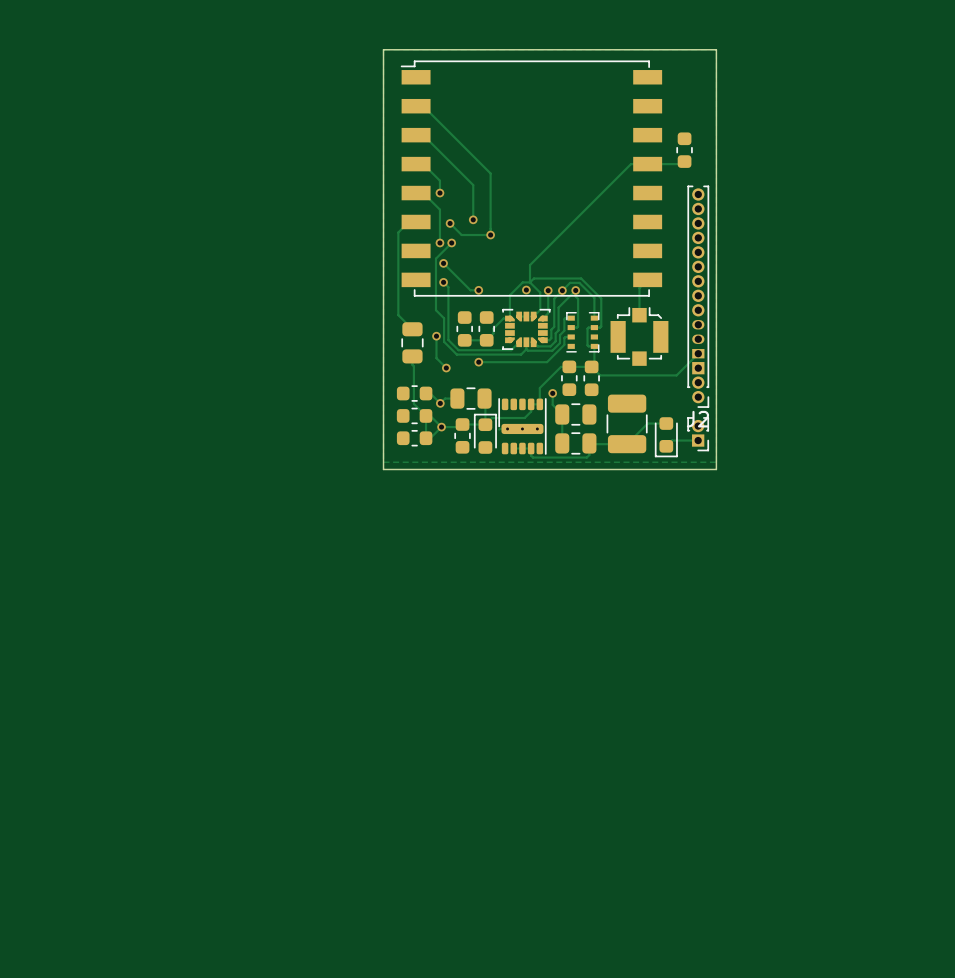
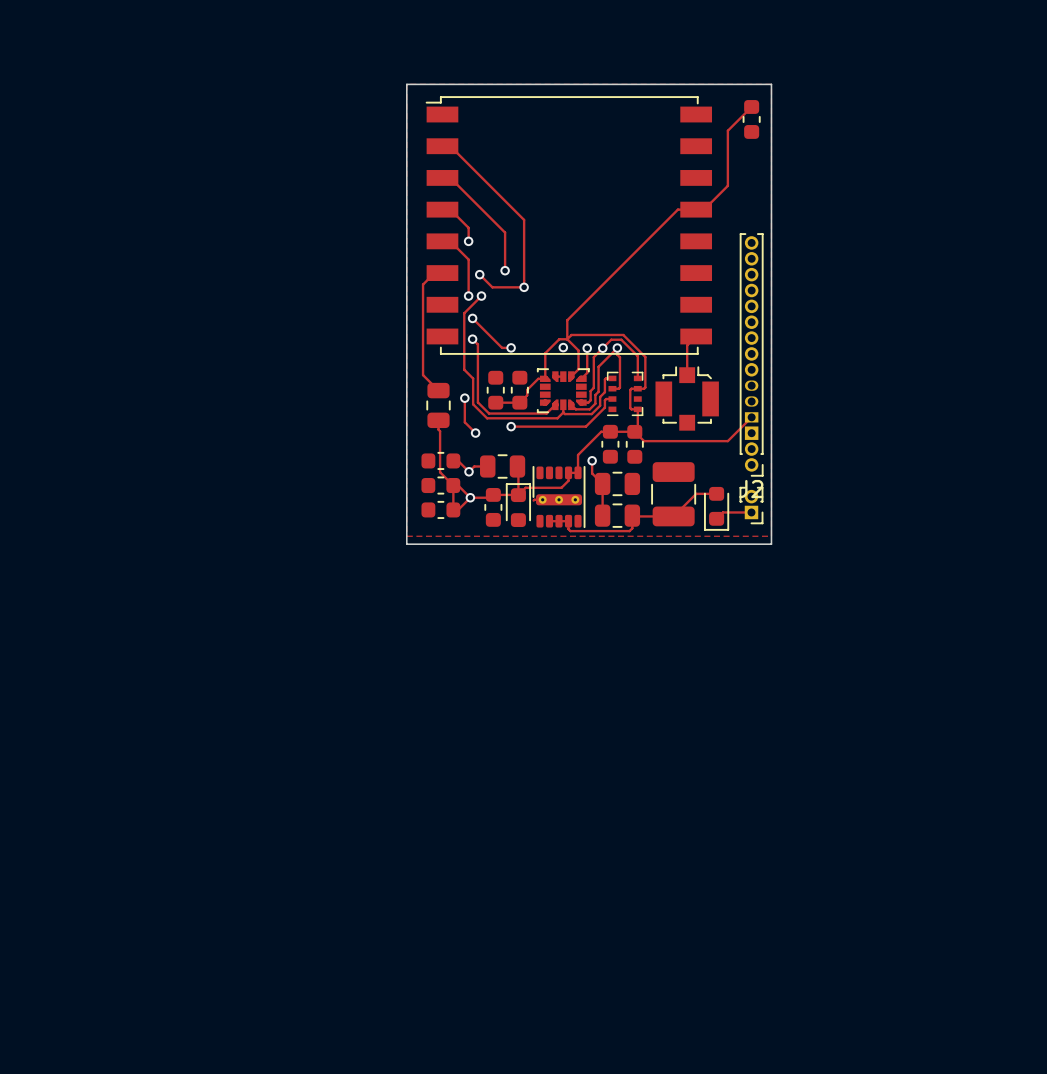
part position: (684, 150) -> (751, 119)
track: (684, 161) (682, 164) (654, 164) -> (751, 106) (727, 130) (727, 185) (704, 209)

